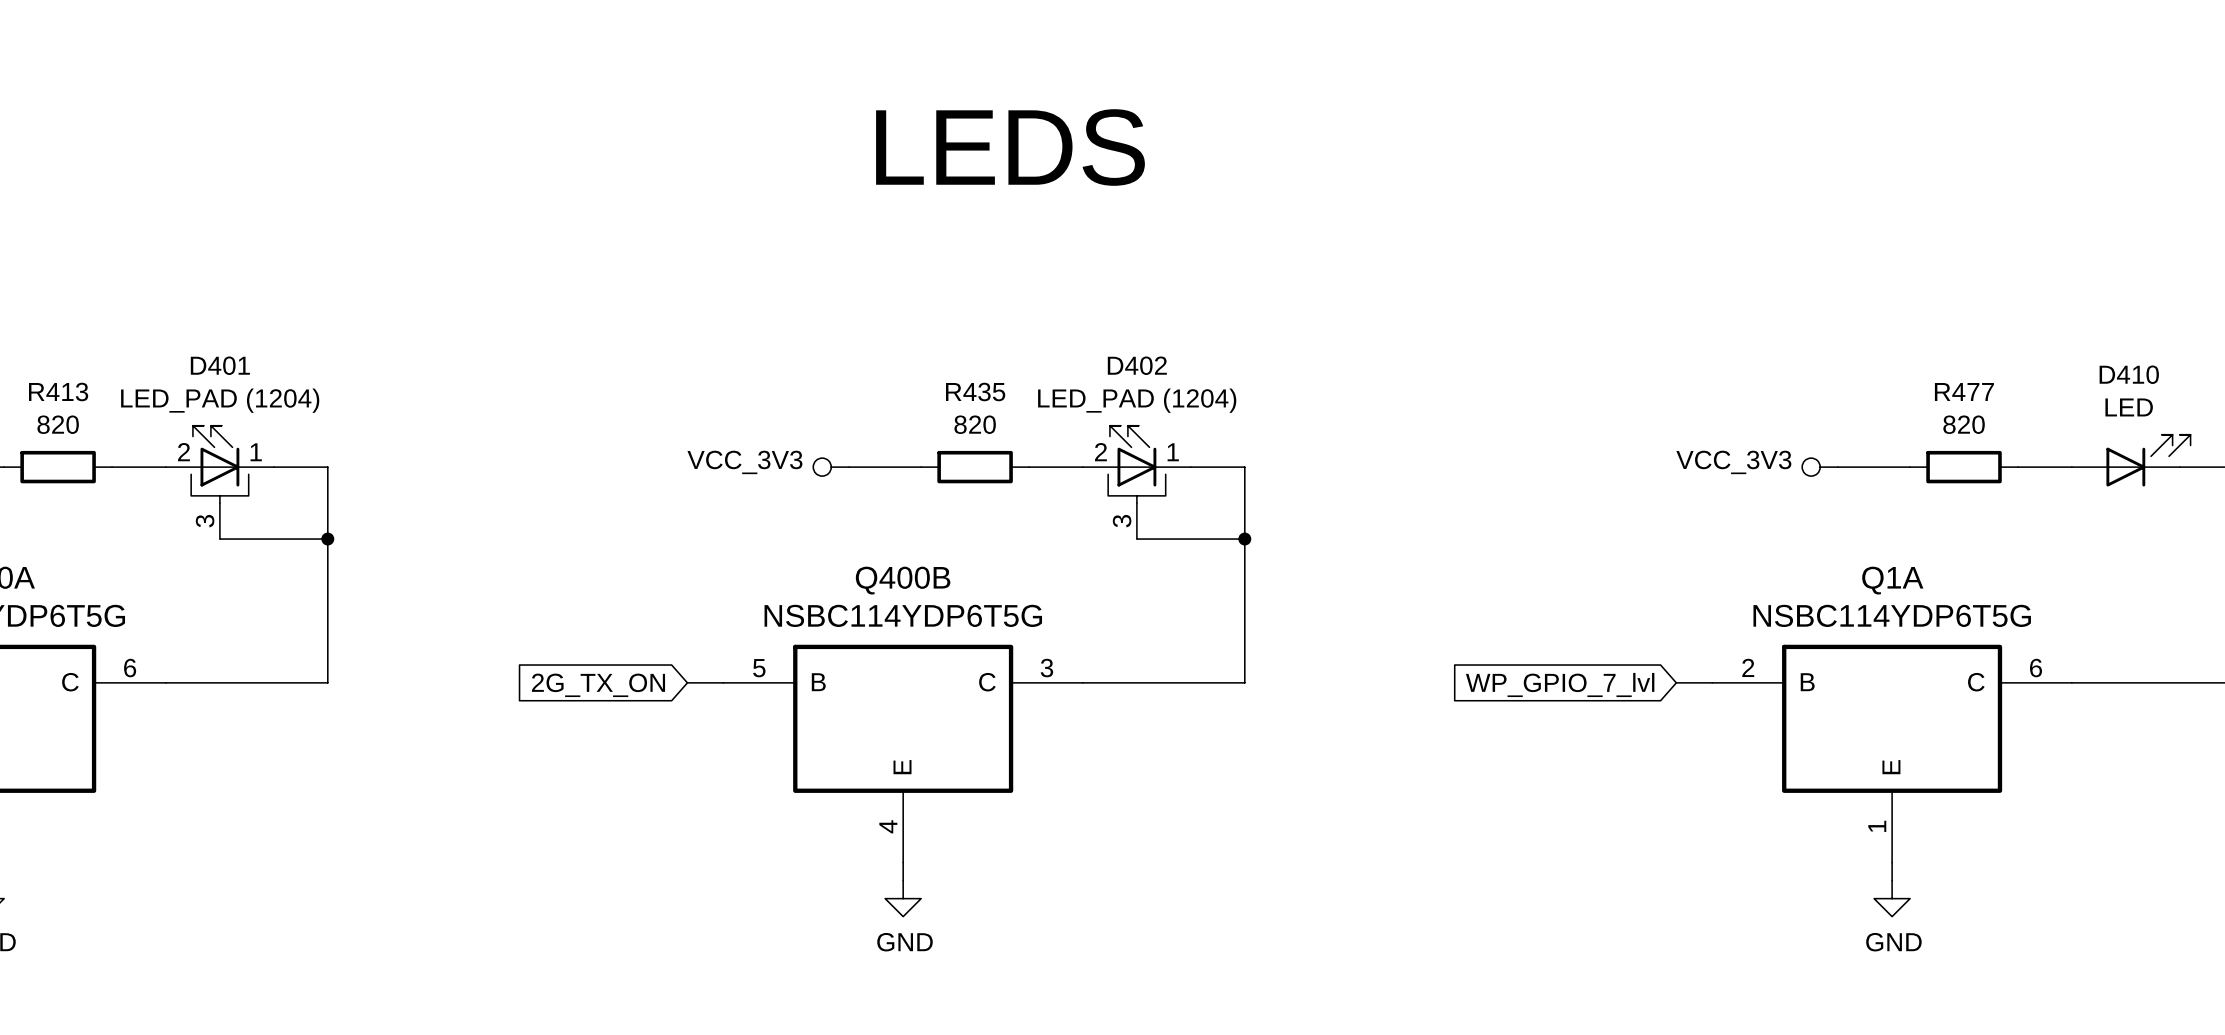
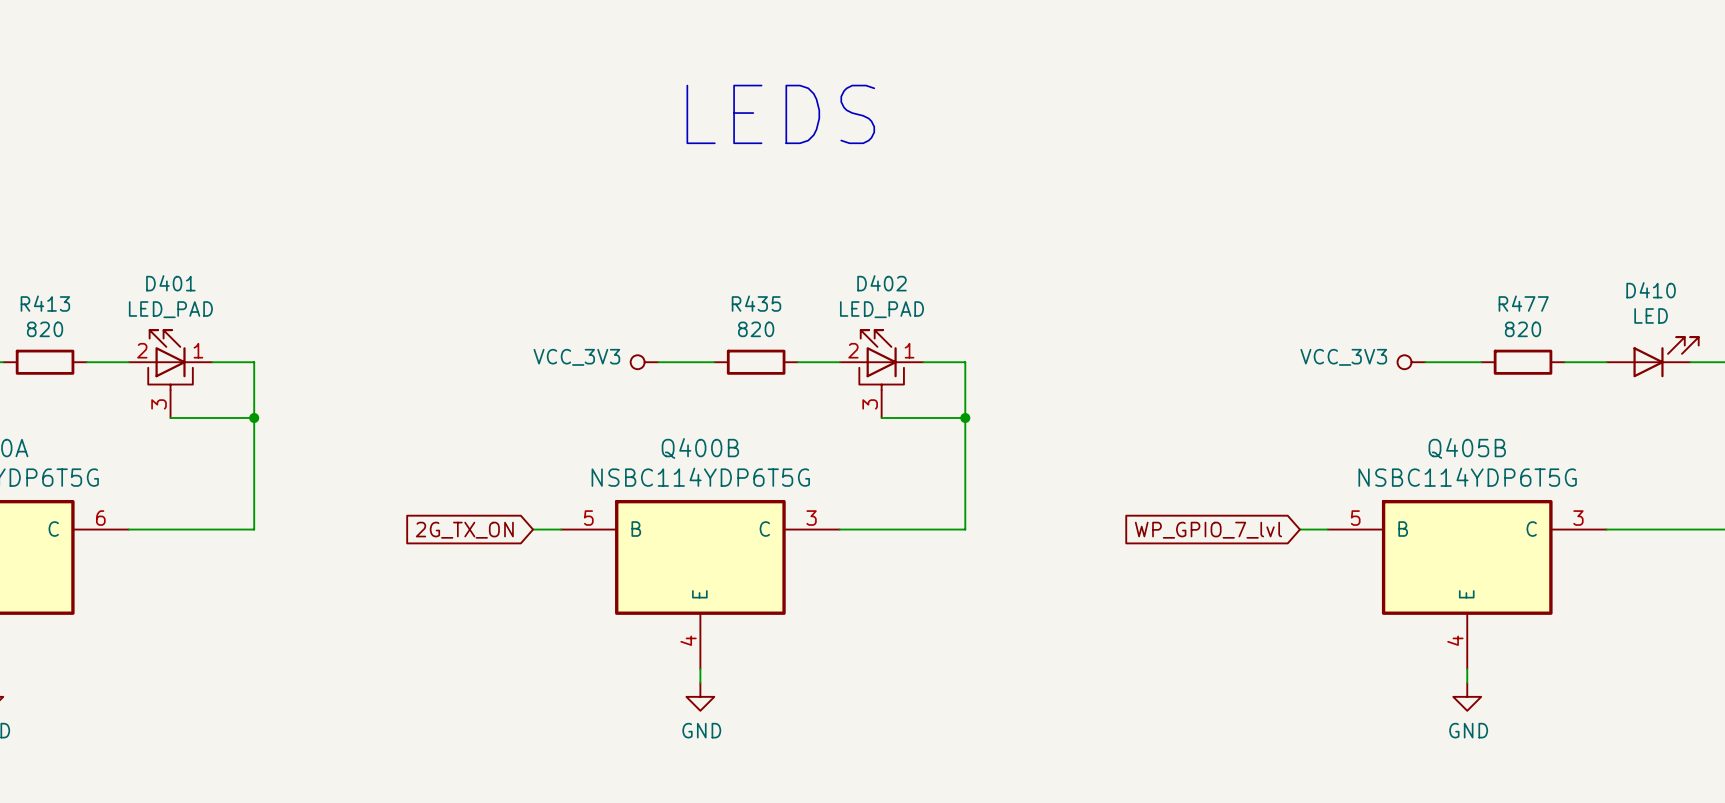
D401 value: LED_PAD (1204) (220, 400) -> LED_PAD (170, 309)
D402 value: LED_PAD (1204) (1137, 400) -> LED_PAD (881, 309)
Q1A name: Q1A (1892, 580) -> Q405B (1467, 448)
Q1A pin number: 2 (1748, 667) -> 5 (1355, 518)
Q1A pin number: 6 (2036, 668) -> 3 (1578, 518)
Q1A pin number: 1 (1877, 826) -> 4 (1455, 640)

